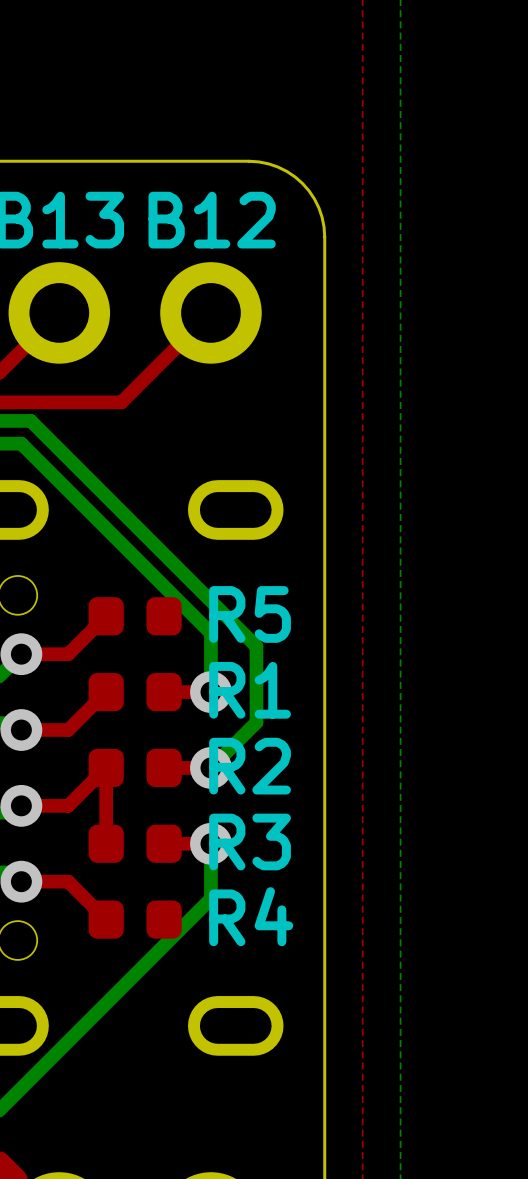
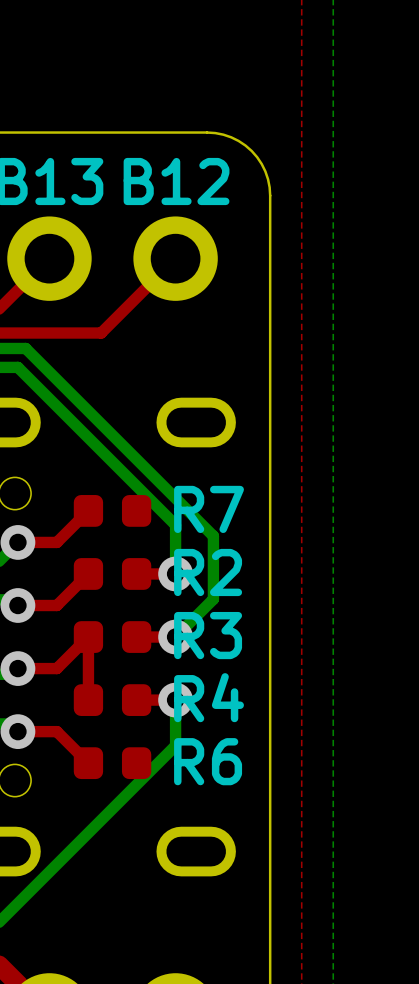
R5 name: R5 (250, 614) -> R7 (209, 509)
R1 name: R1 (250, 690) -> R2 (208, 572)
R2 name: R2 (250, 766) -> R3 (208, 635)
R3 name: R3 (250, 841) -> R4 (209, 697)
R4 name: R4 (251, 916) -> R6 (208, 761)

